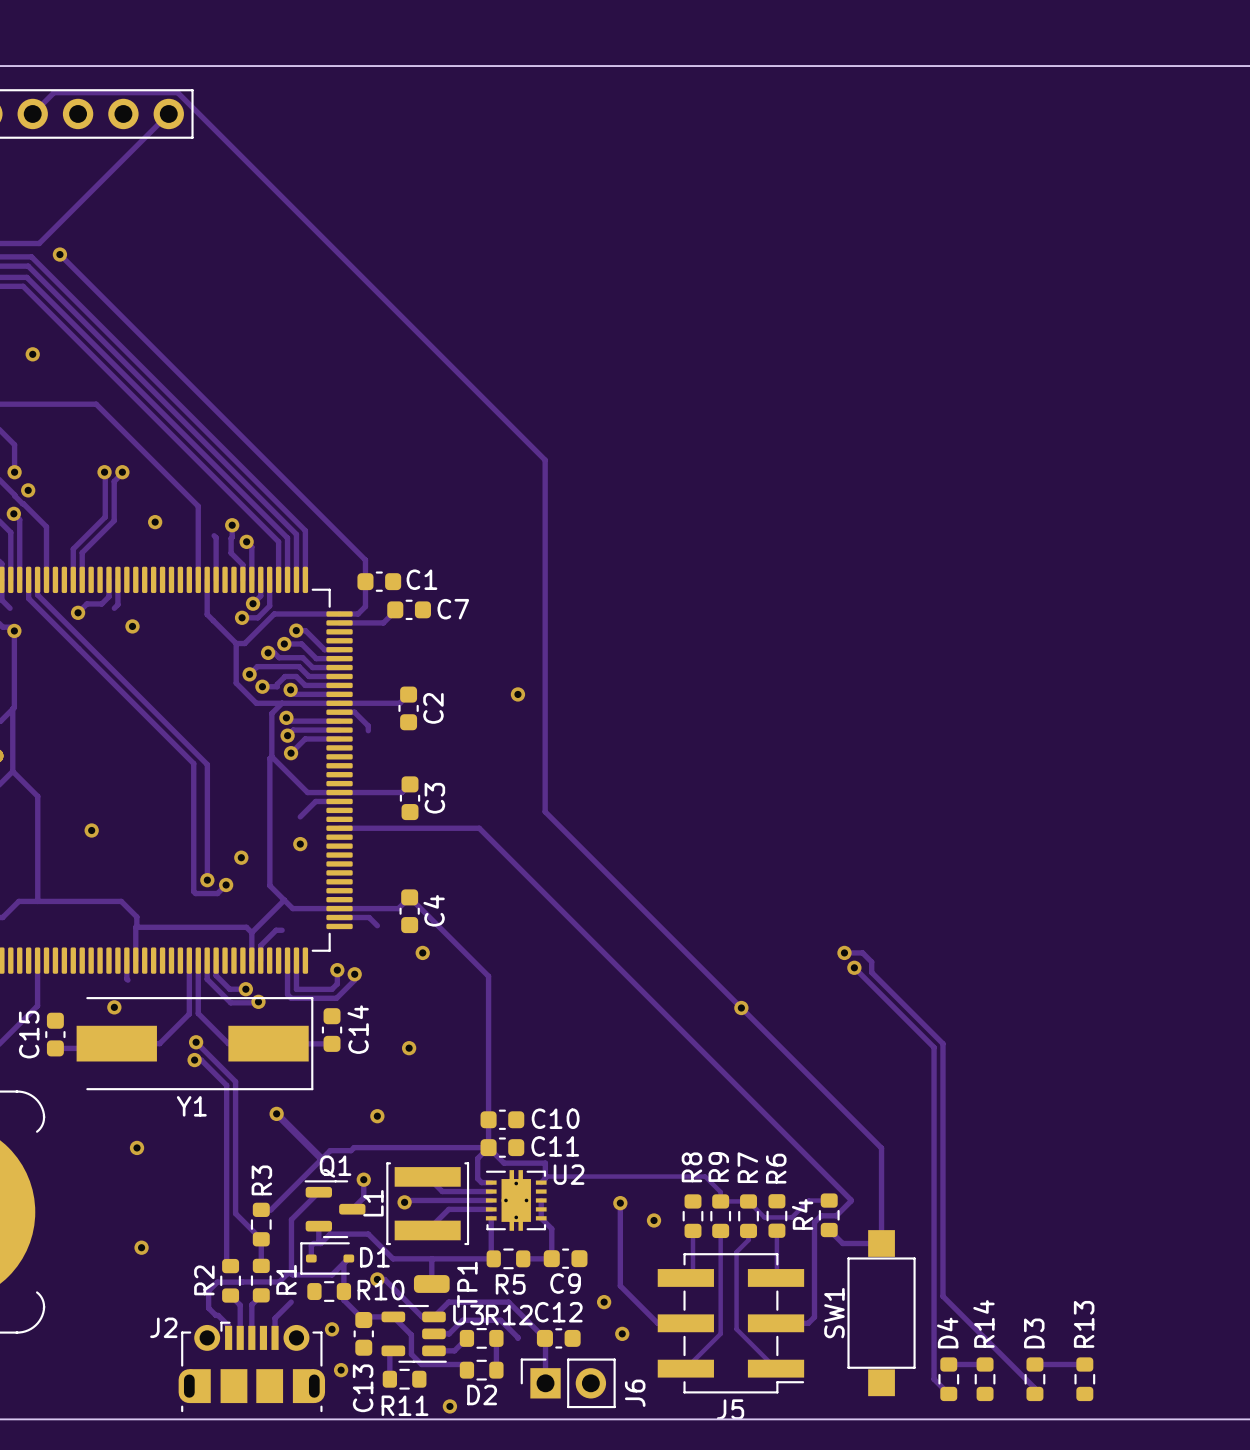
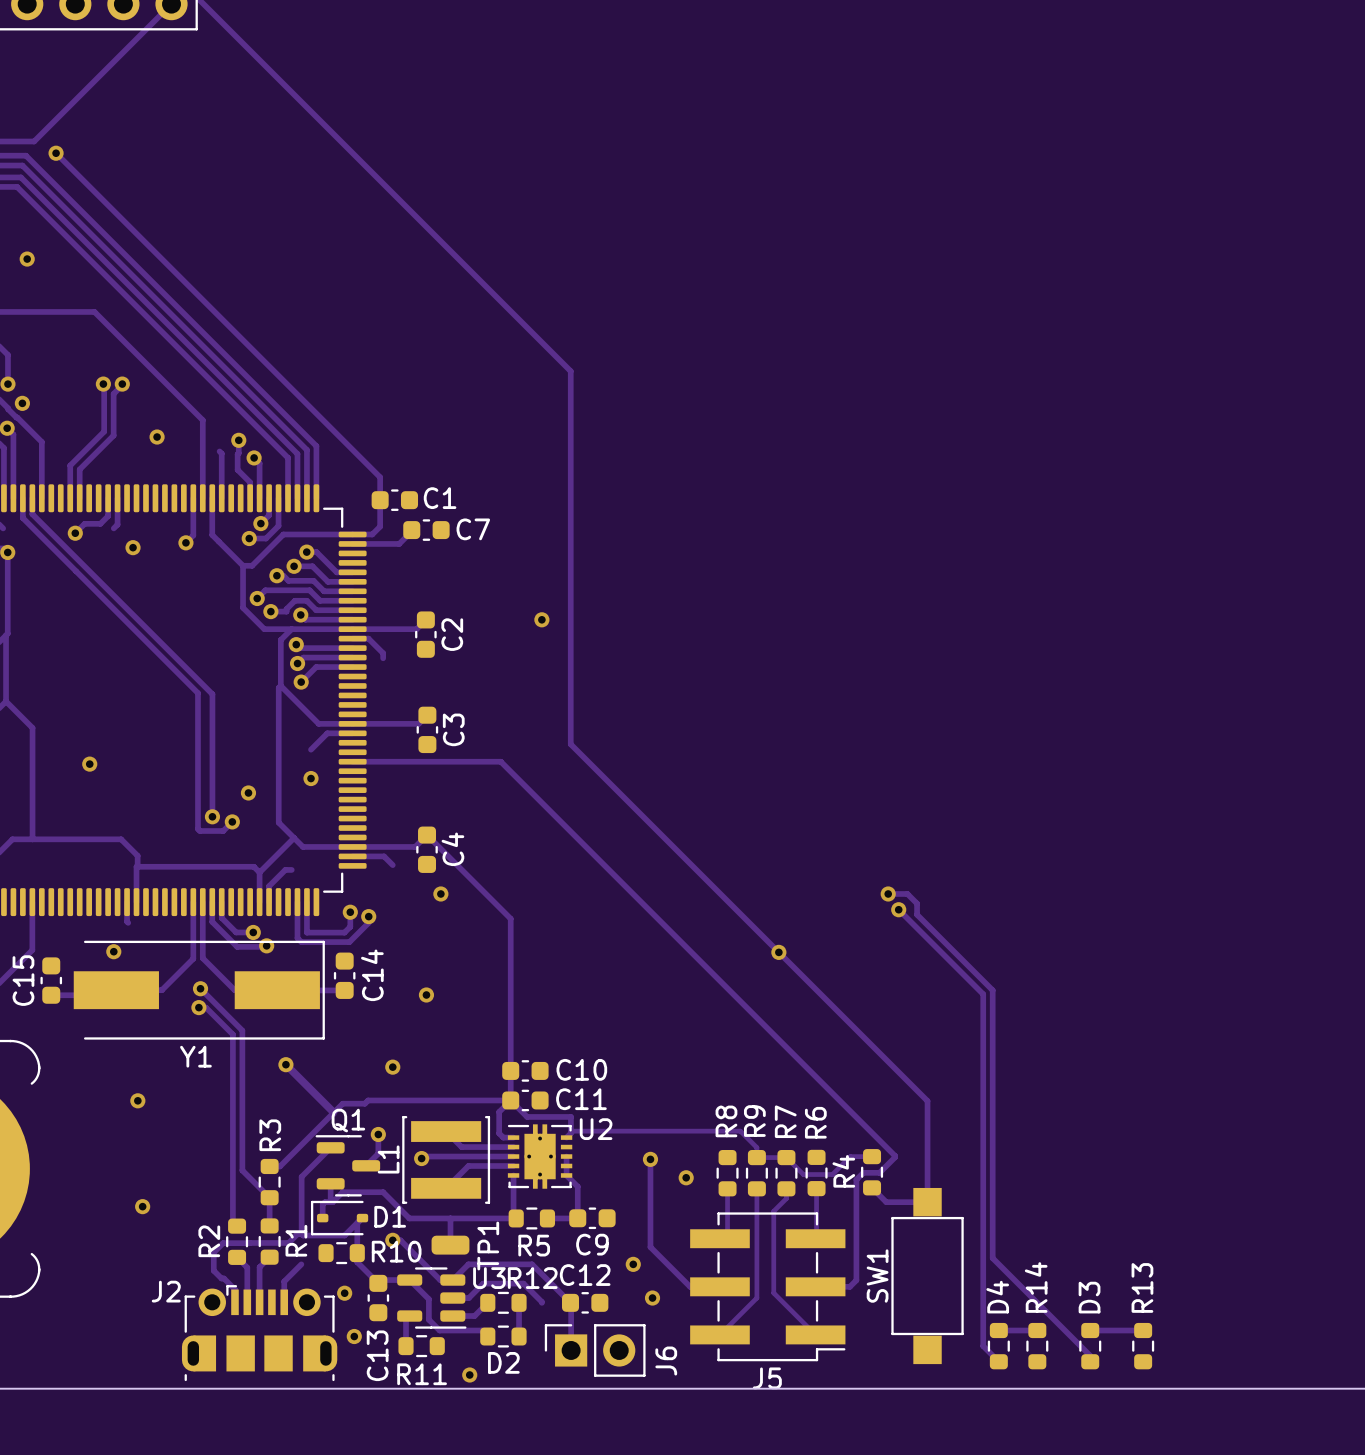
track: none -> (193, 498) (193, 535) (185, 542)
via: none -> (185, 542)

